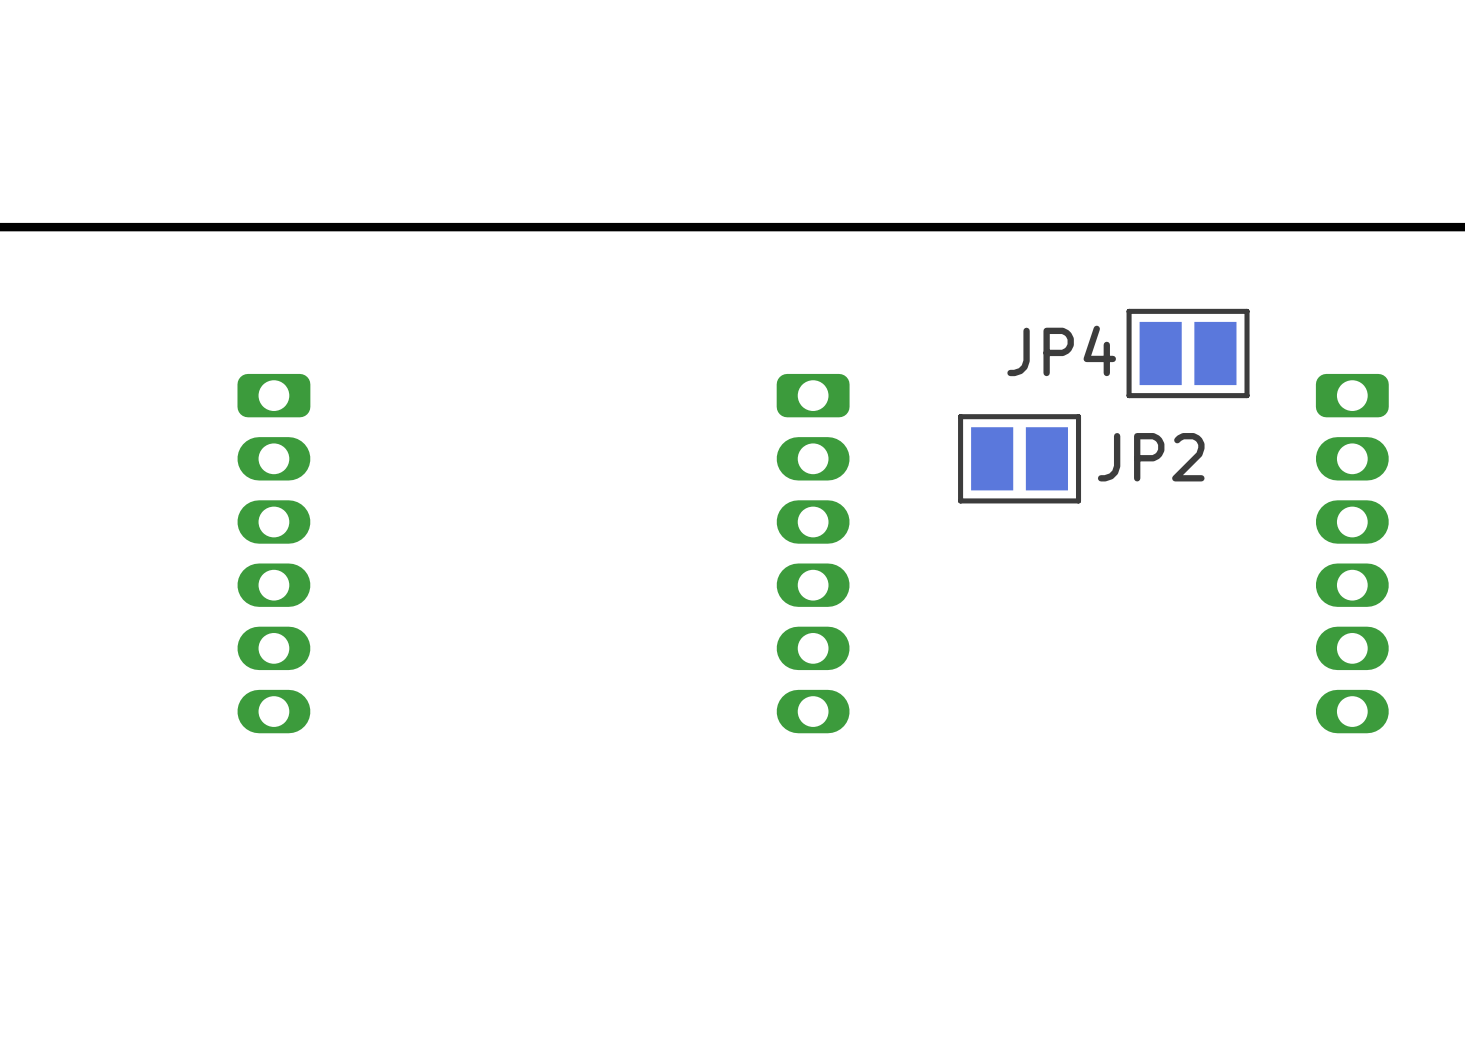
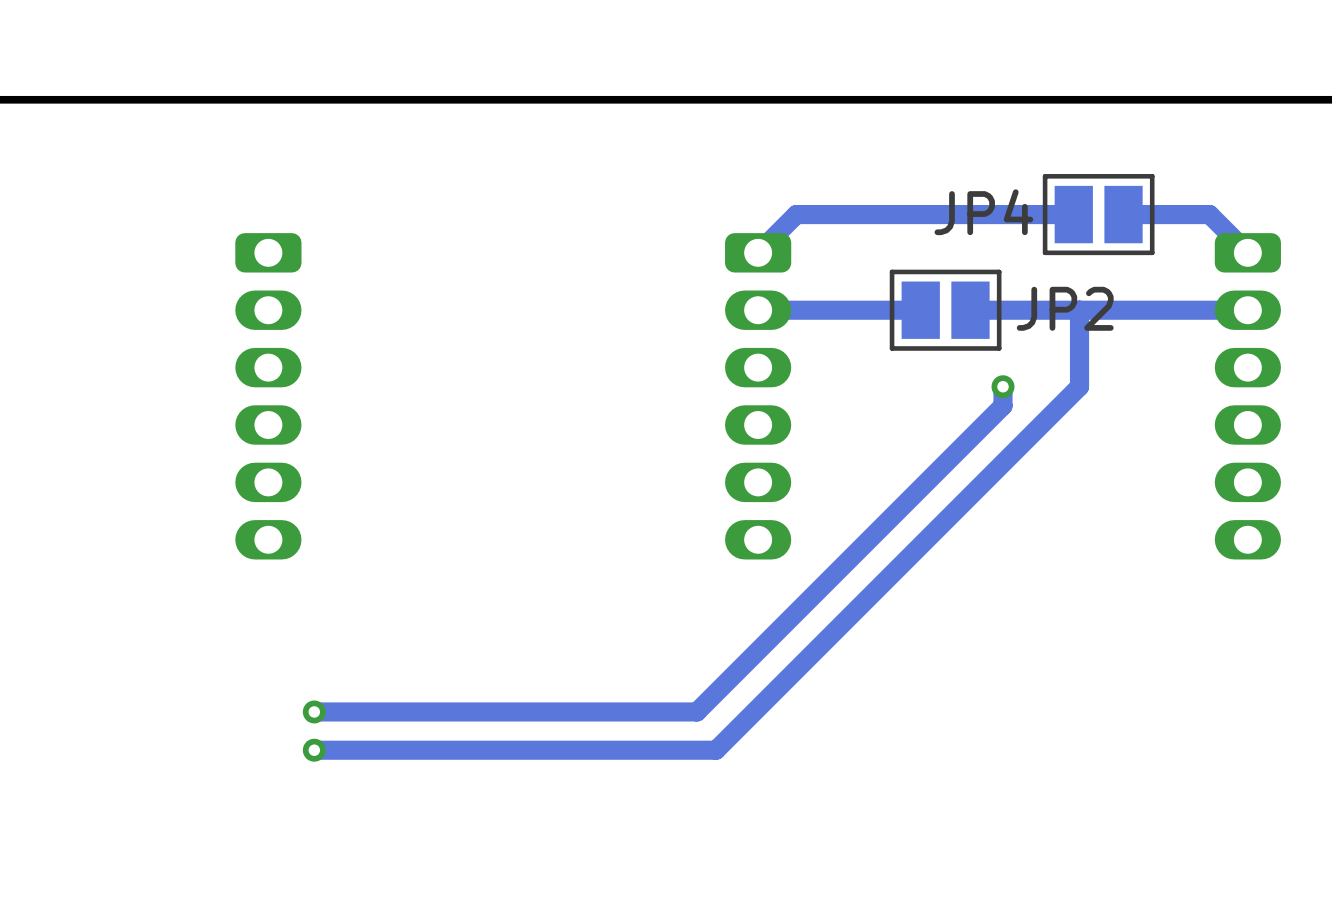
track: none -> (1073, 214) (796, 214) (758, 252)
track: none -> (1123, 214) (1209, 214) (1247, 252)
track: none -> (920, 310) (758, 310)
track: none -> (1079, 310) (1079, 386) (716, 750) (314, 750)
track: none -> (1247, 310) (970, 310)
track: none -> (1003, 386) (1003, 405) (696, 711) (314, 711)
via: none -> (1003, 386)
via: none -> (314, 711)
via: none -> (314, 750)

